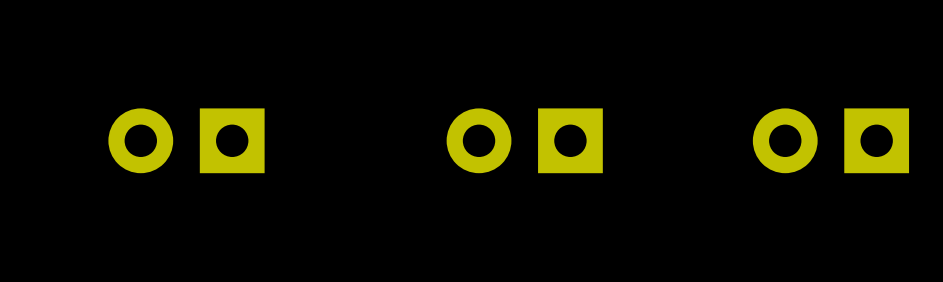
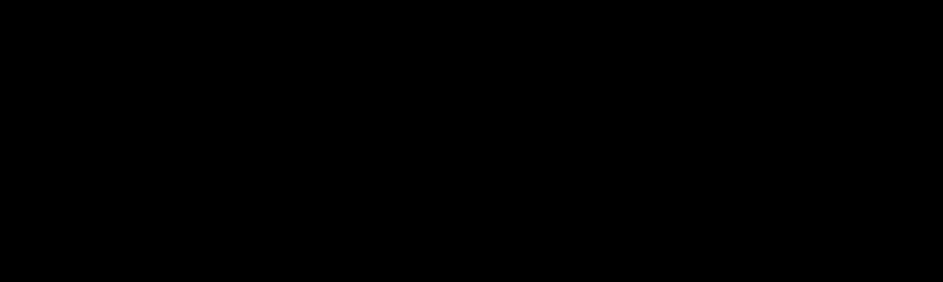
part: (186, 140) -> none
part: (524, 140) -> none
part: (830, 140) -> none

